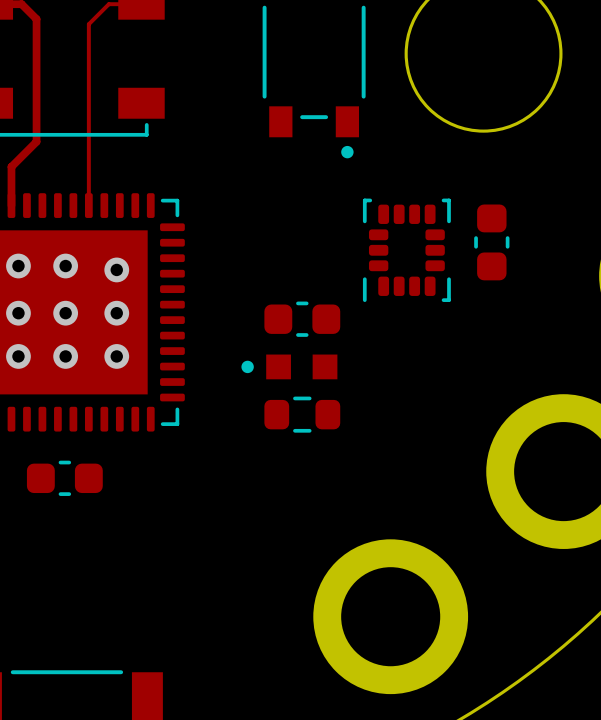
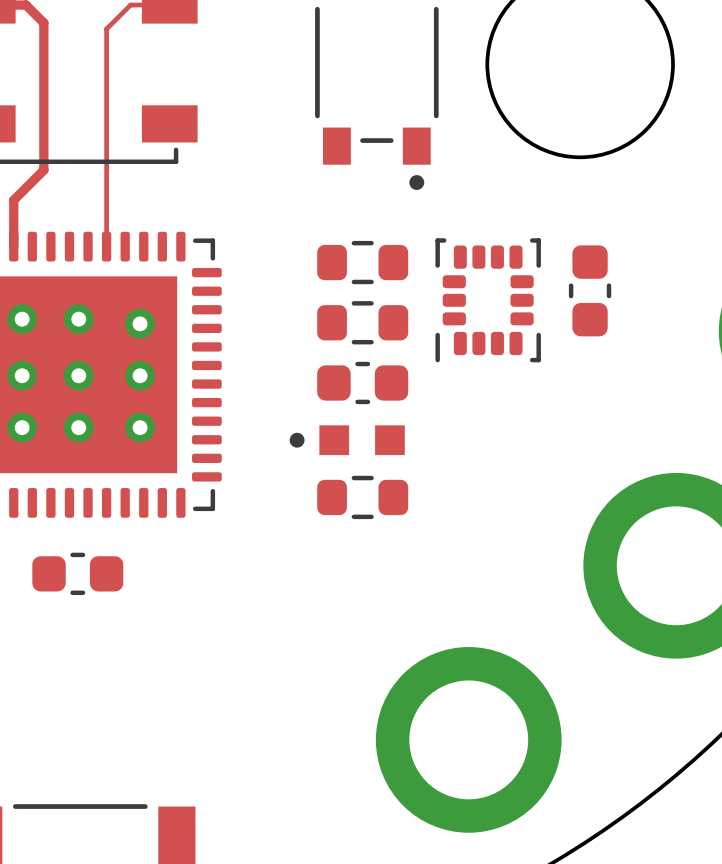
part: none -> (362, 262)
part: none -> (362, 322)

